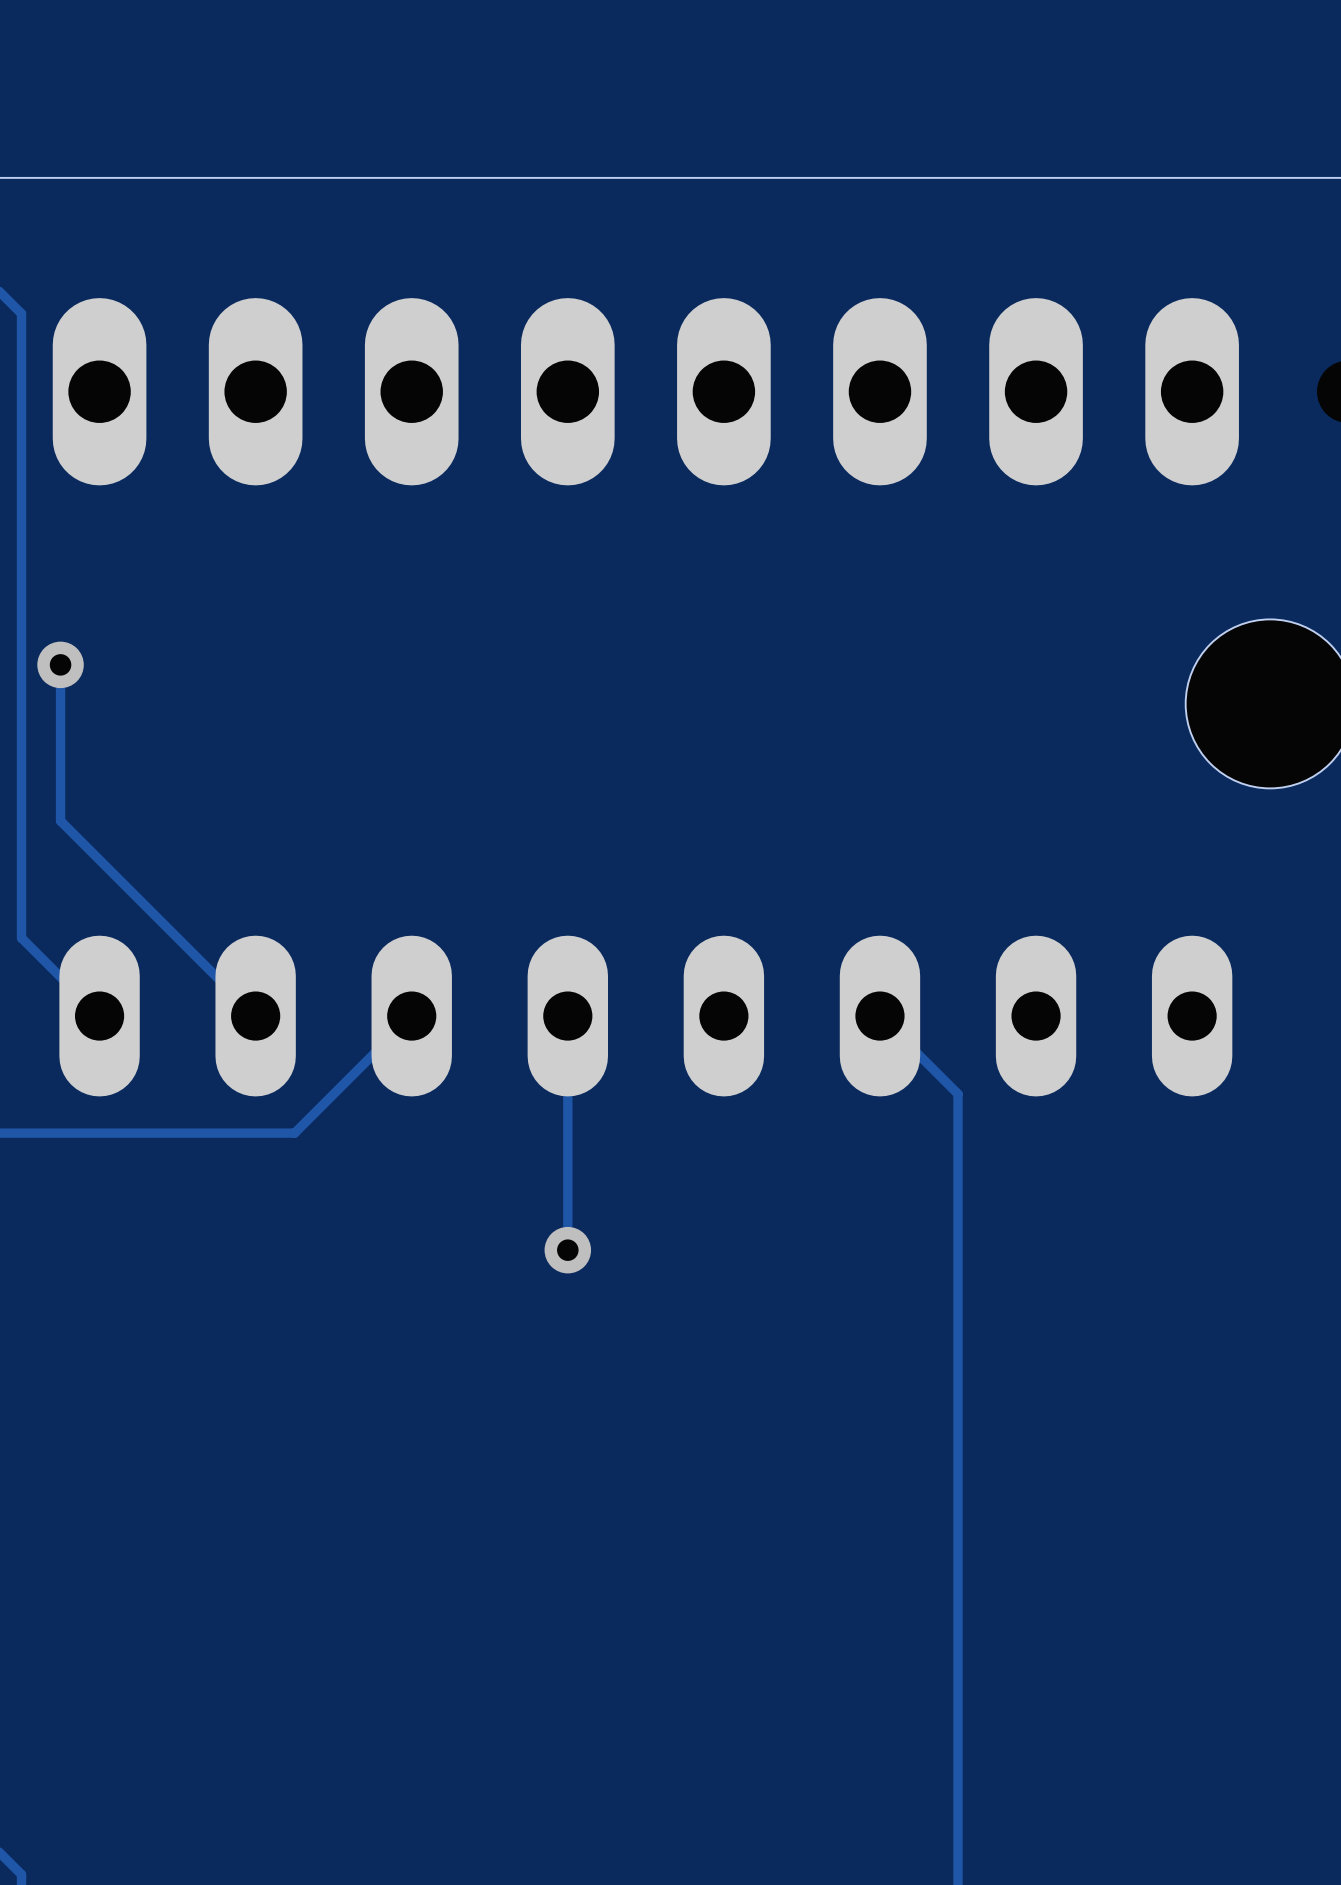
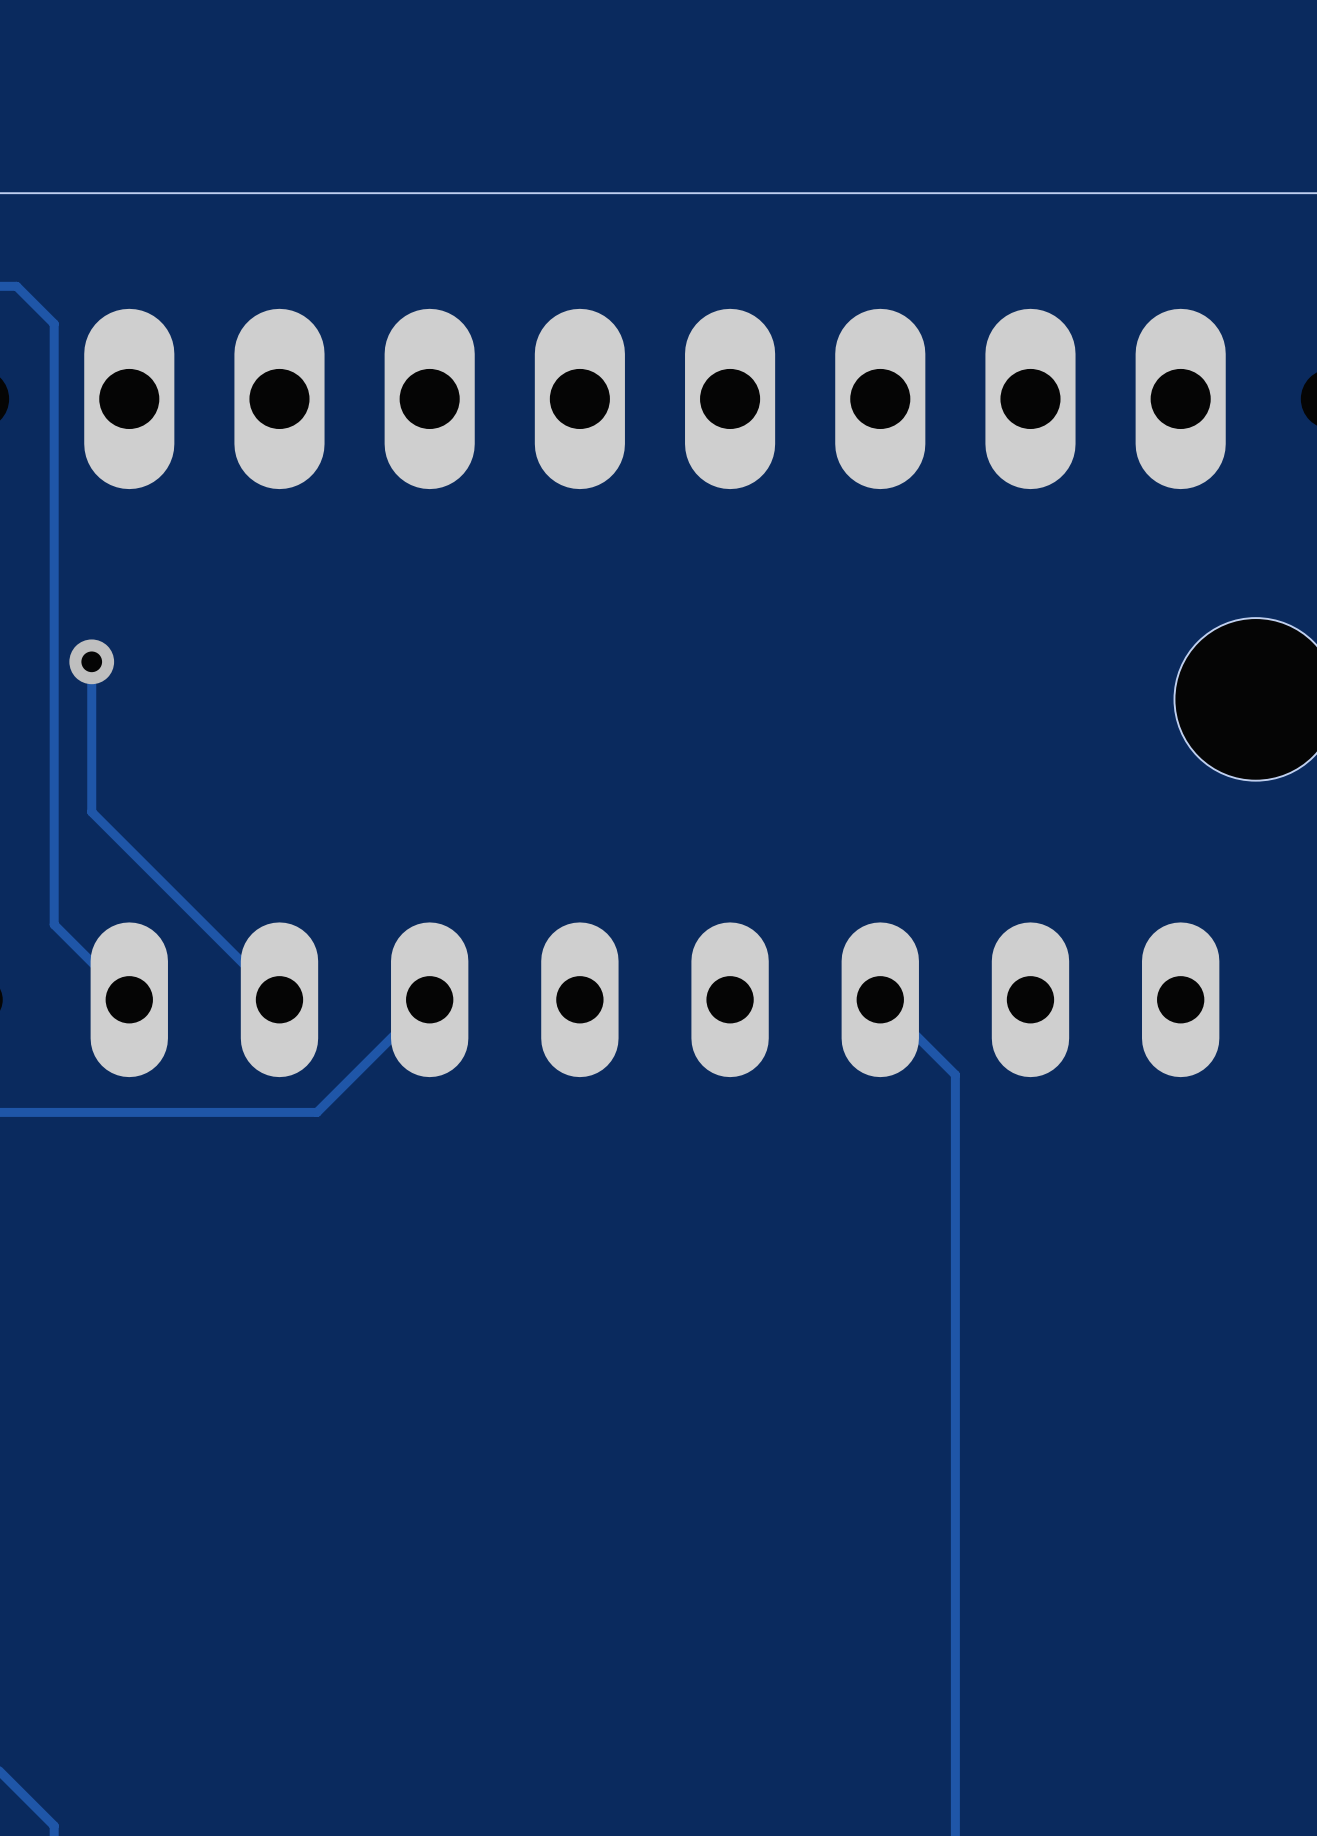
track: (567, 1016) (567, 1250) -> none
via: (567, 1250) -> none

